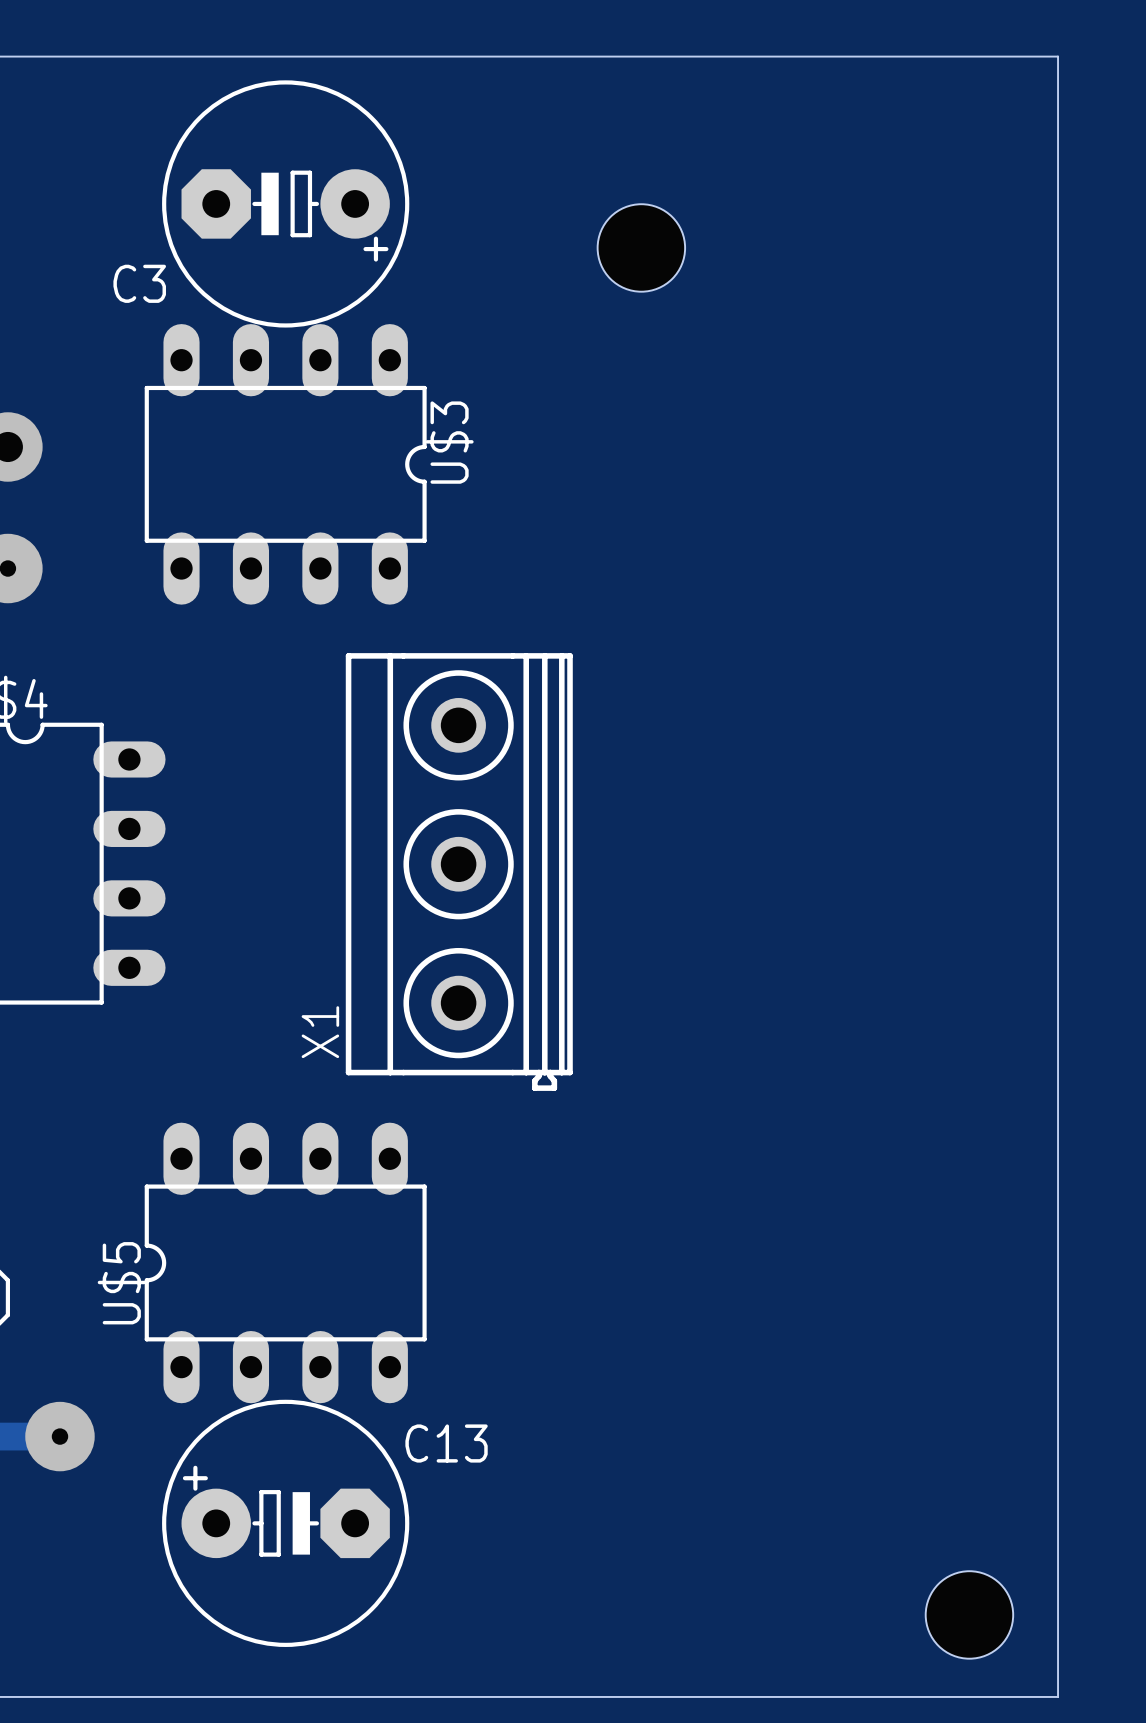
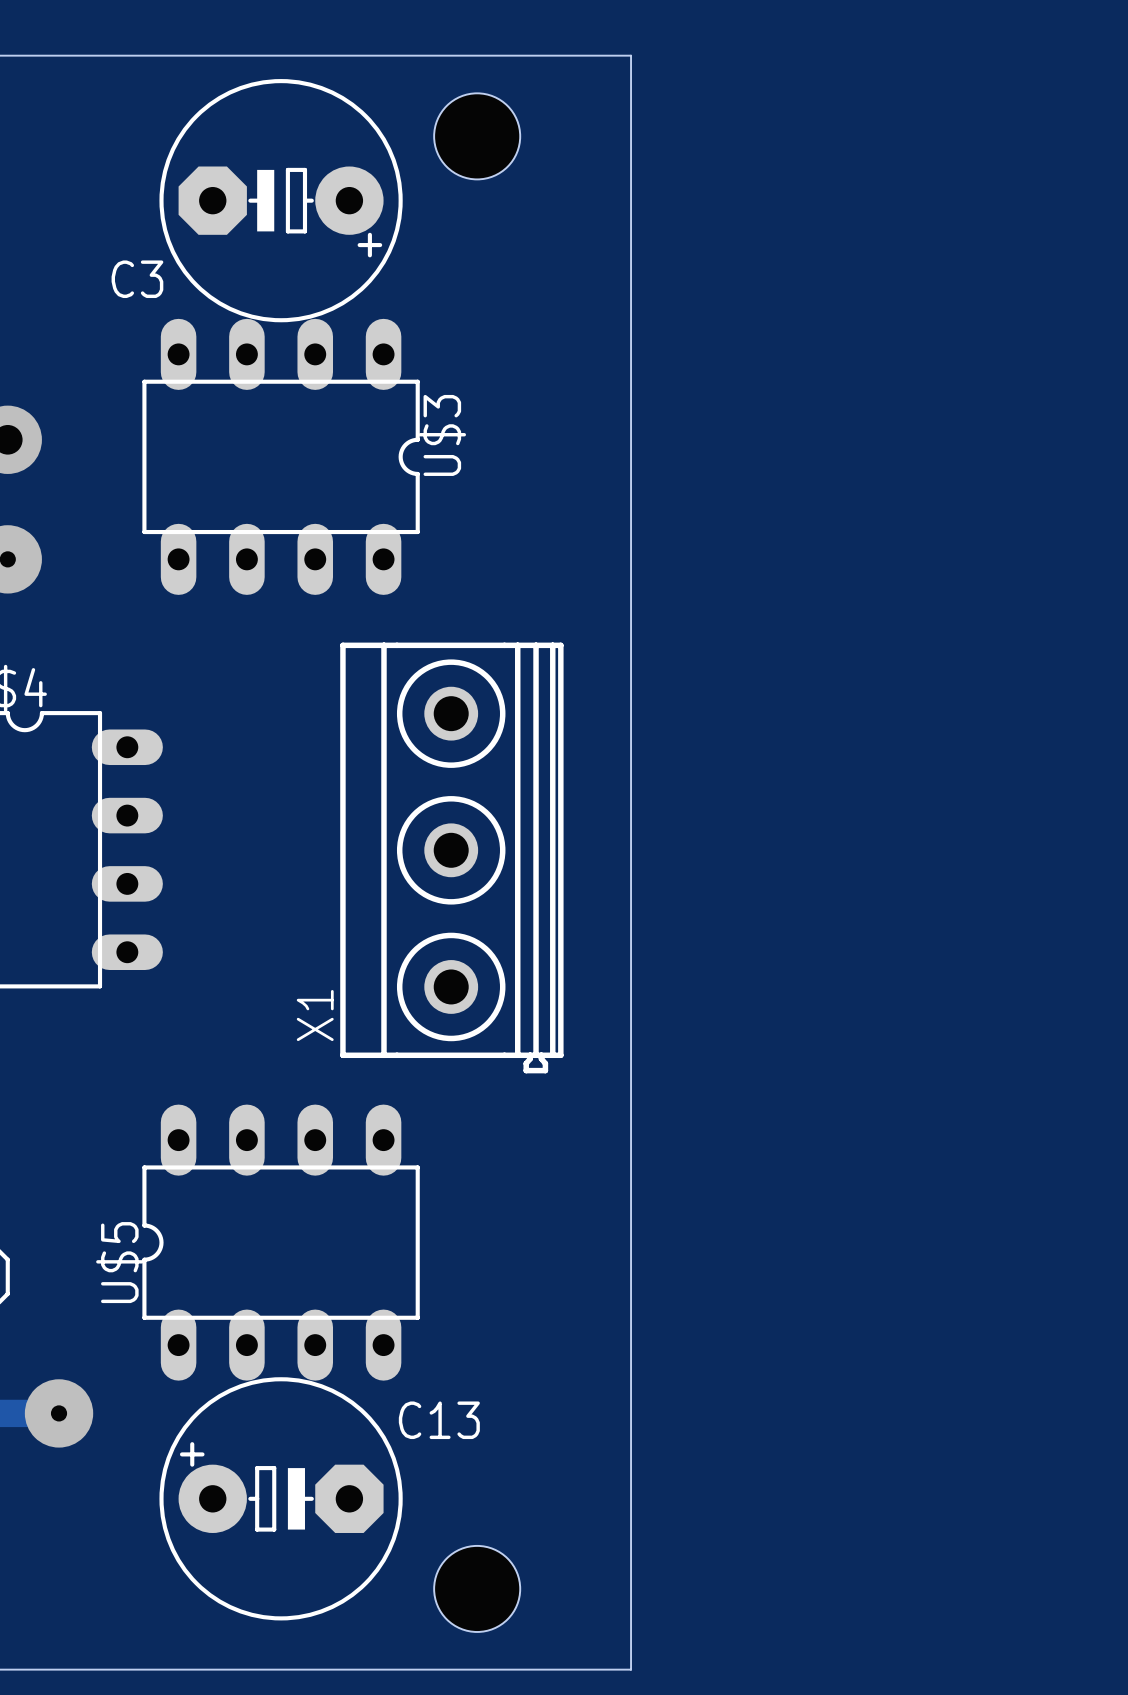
board edge: (641, 56) (1058, 56) (1058, 1696) (641, 1696) -> (631, 55) (631, 1669)
hole position: (641, 247) -> (477, 136)
hole position: (969, 1614) -> (477, 1588)

